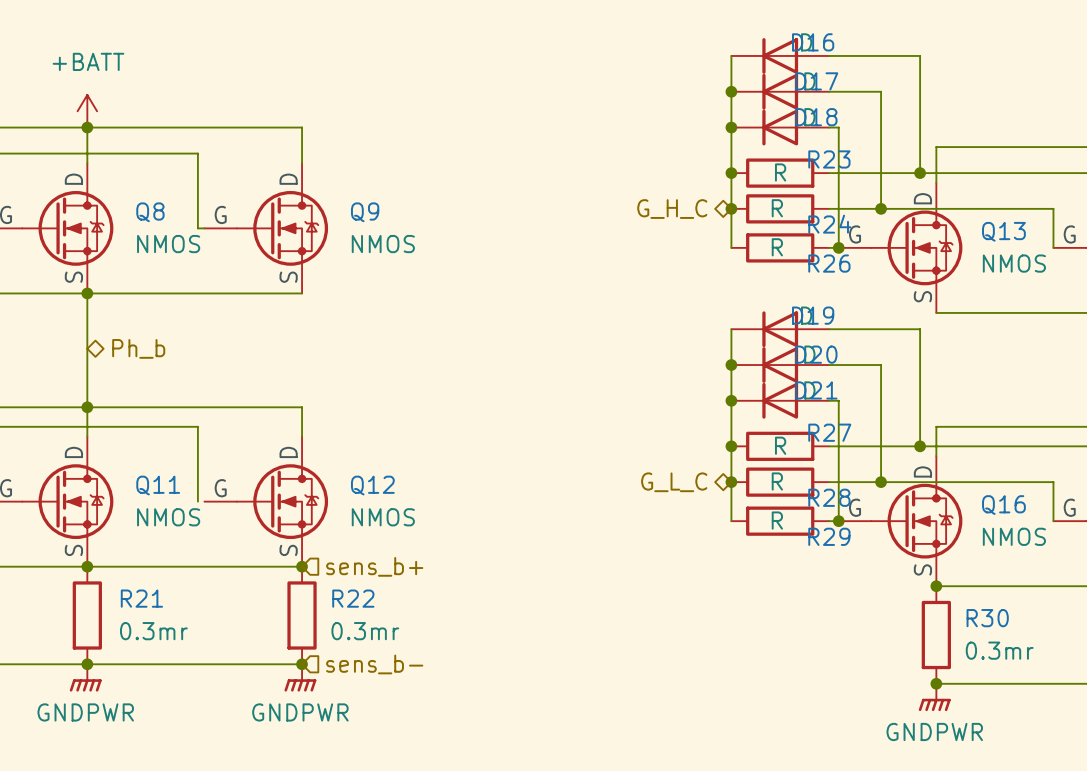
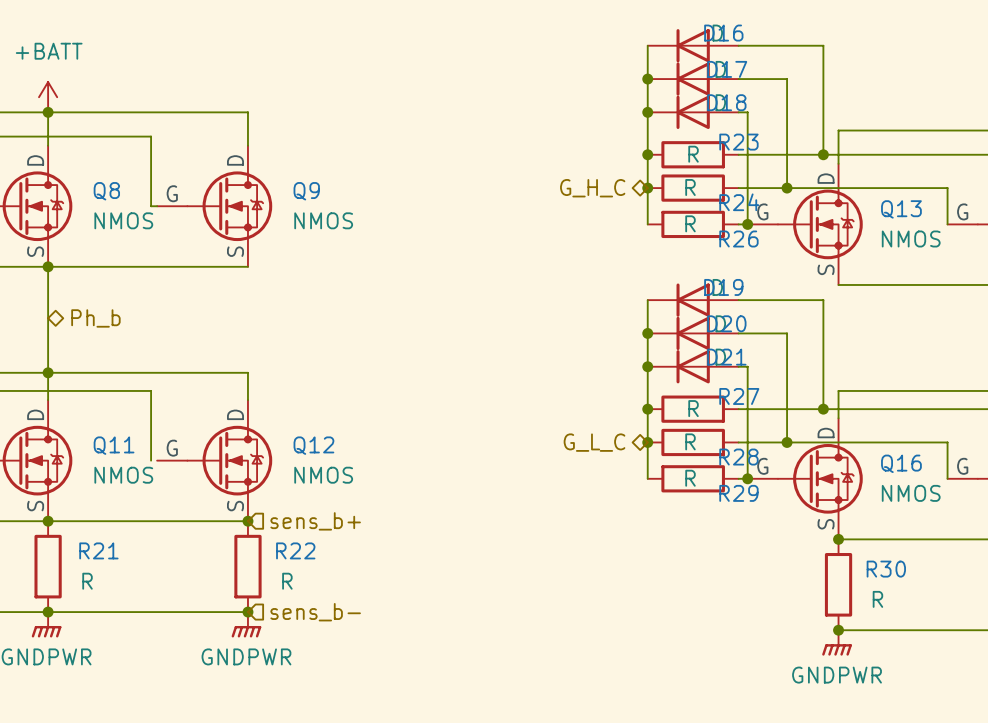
R21 value: 0.3mr (153, 631) -> R (87, 581)
R22 value: 0.3mr (365, 631) -> R (287, 581)
R30 value: 0.3mr (999, 650) -> R (877, 599)

